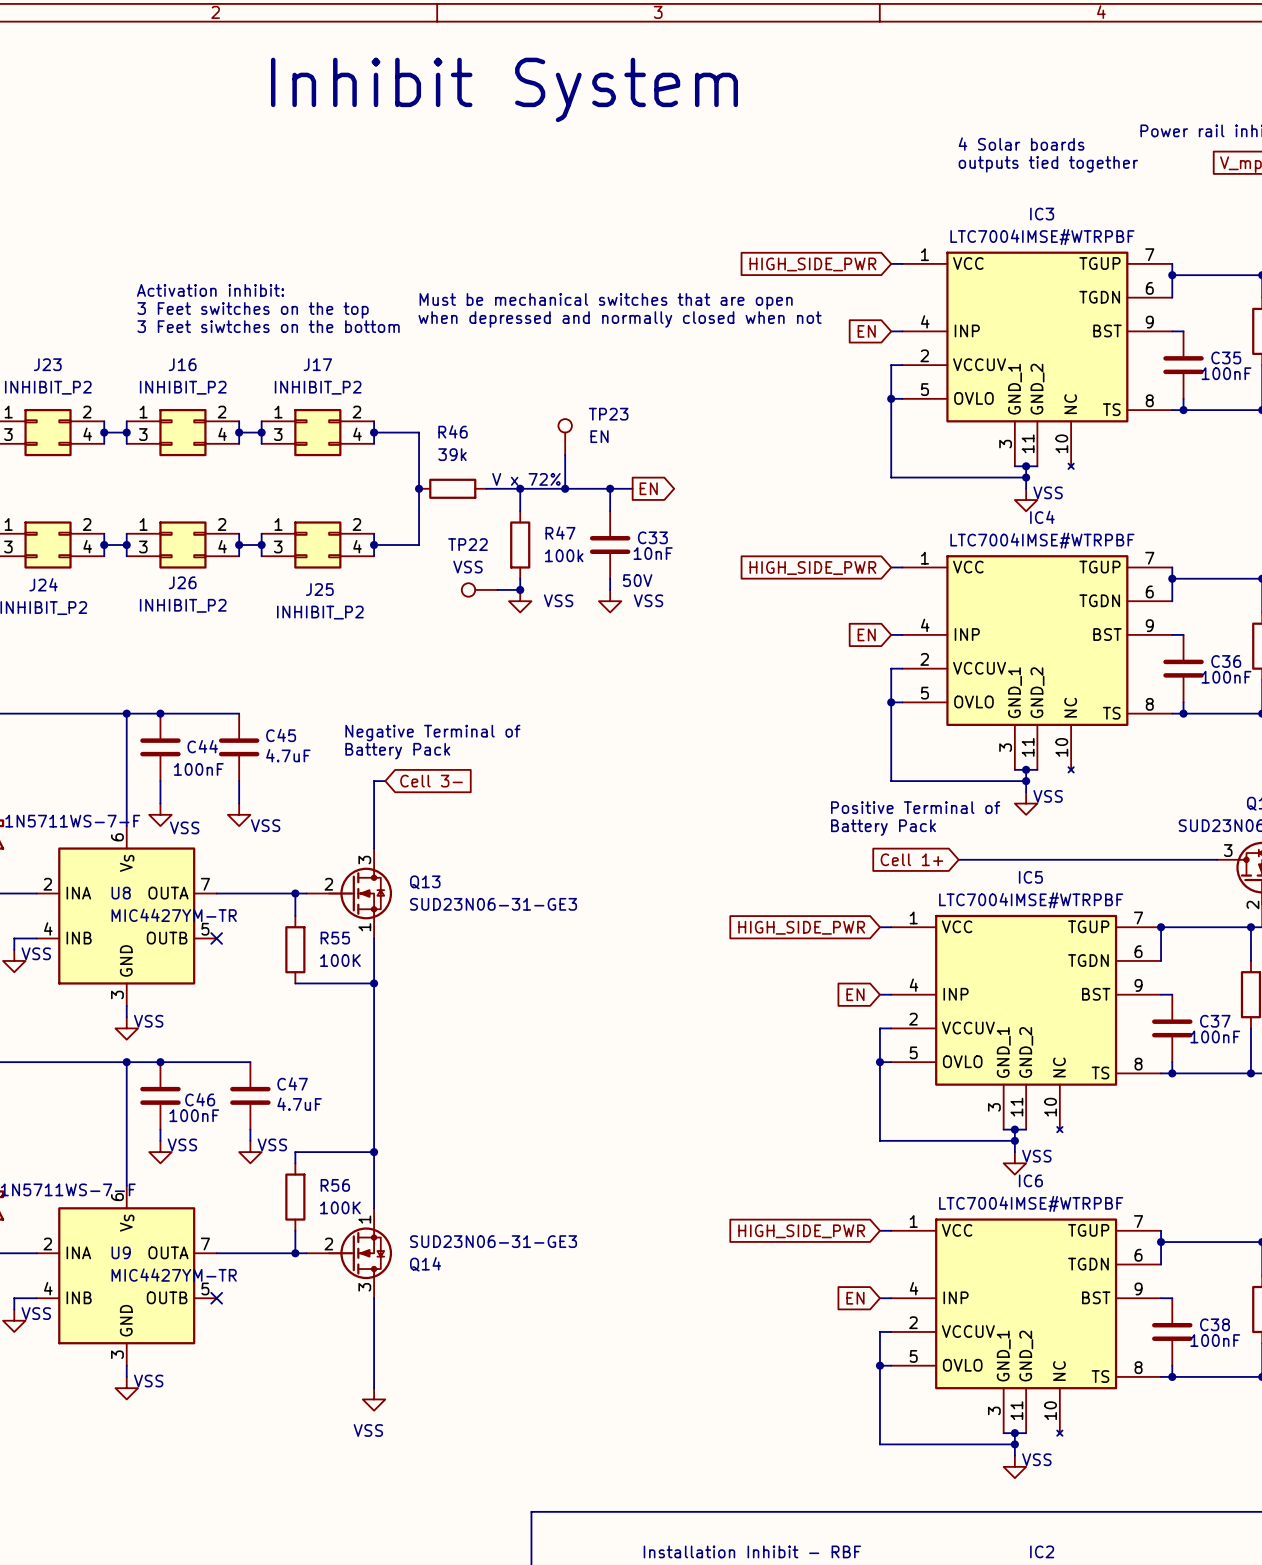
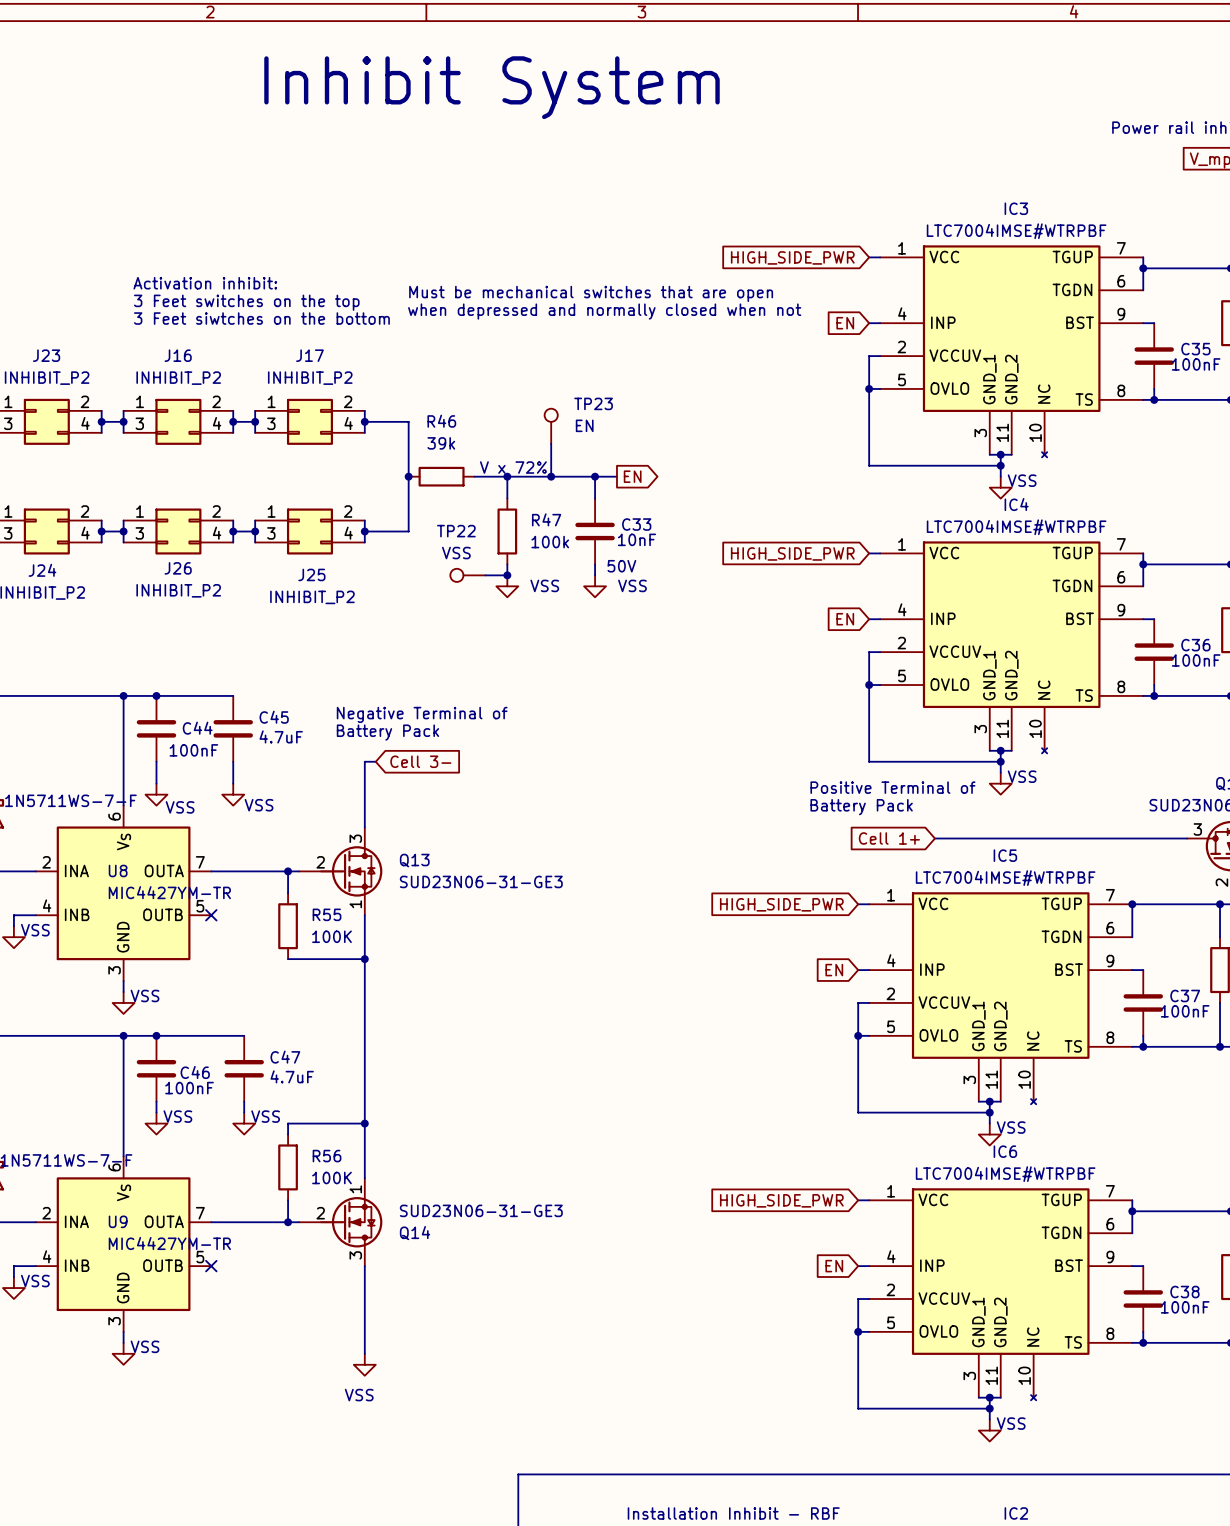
text: 4 Solar boards (1021, 144) -> none
text: outputs tied together (1048, 164) -> none

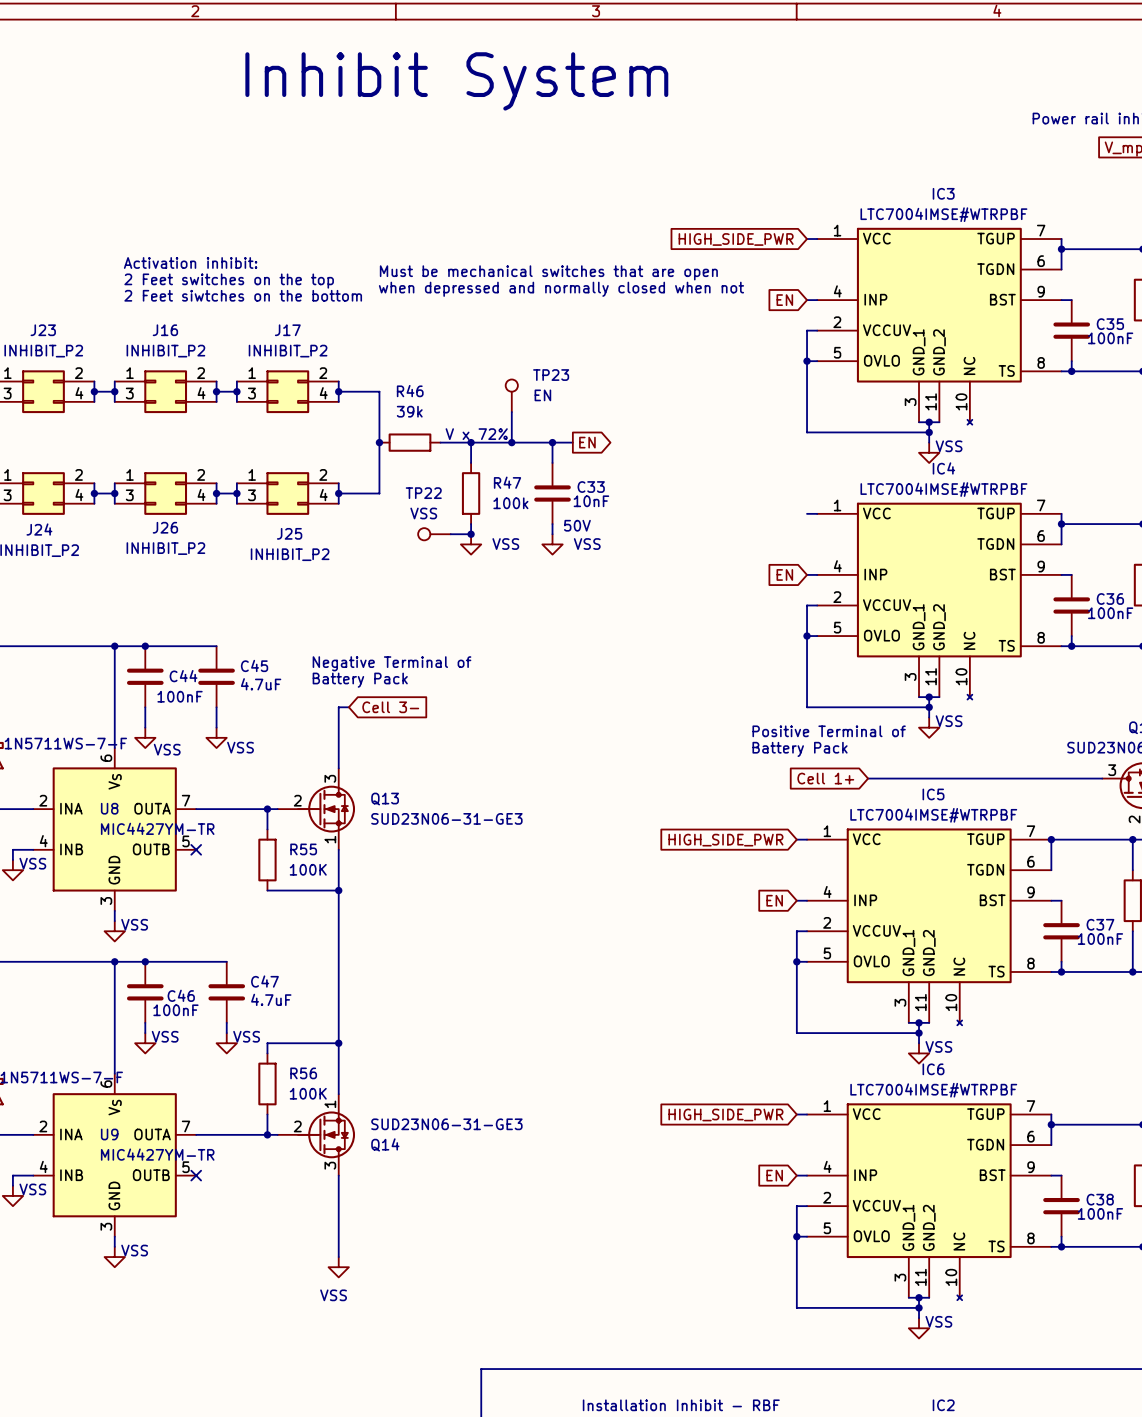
text: 3 Feet switches on the top (246, 302) -> 2 Feet switches on the top (229, 281)
text: 3 Feet siwtches on the bottom (261, 318) -> 2 Feet siwtches on the bottom (243, 295)
global label: HIGH_SIDE_PWR (792, 553) -> none

